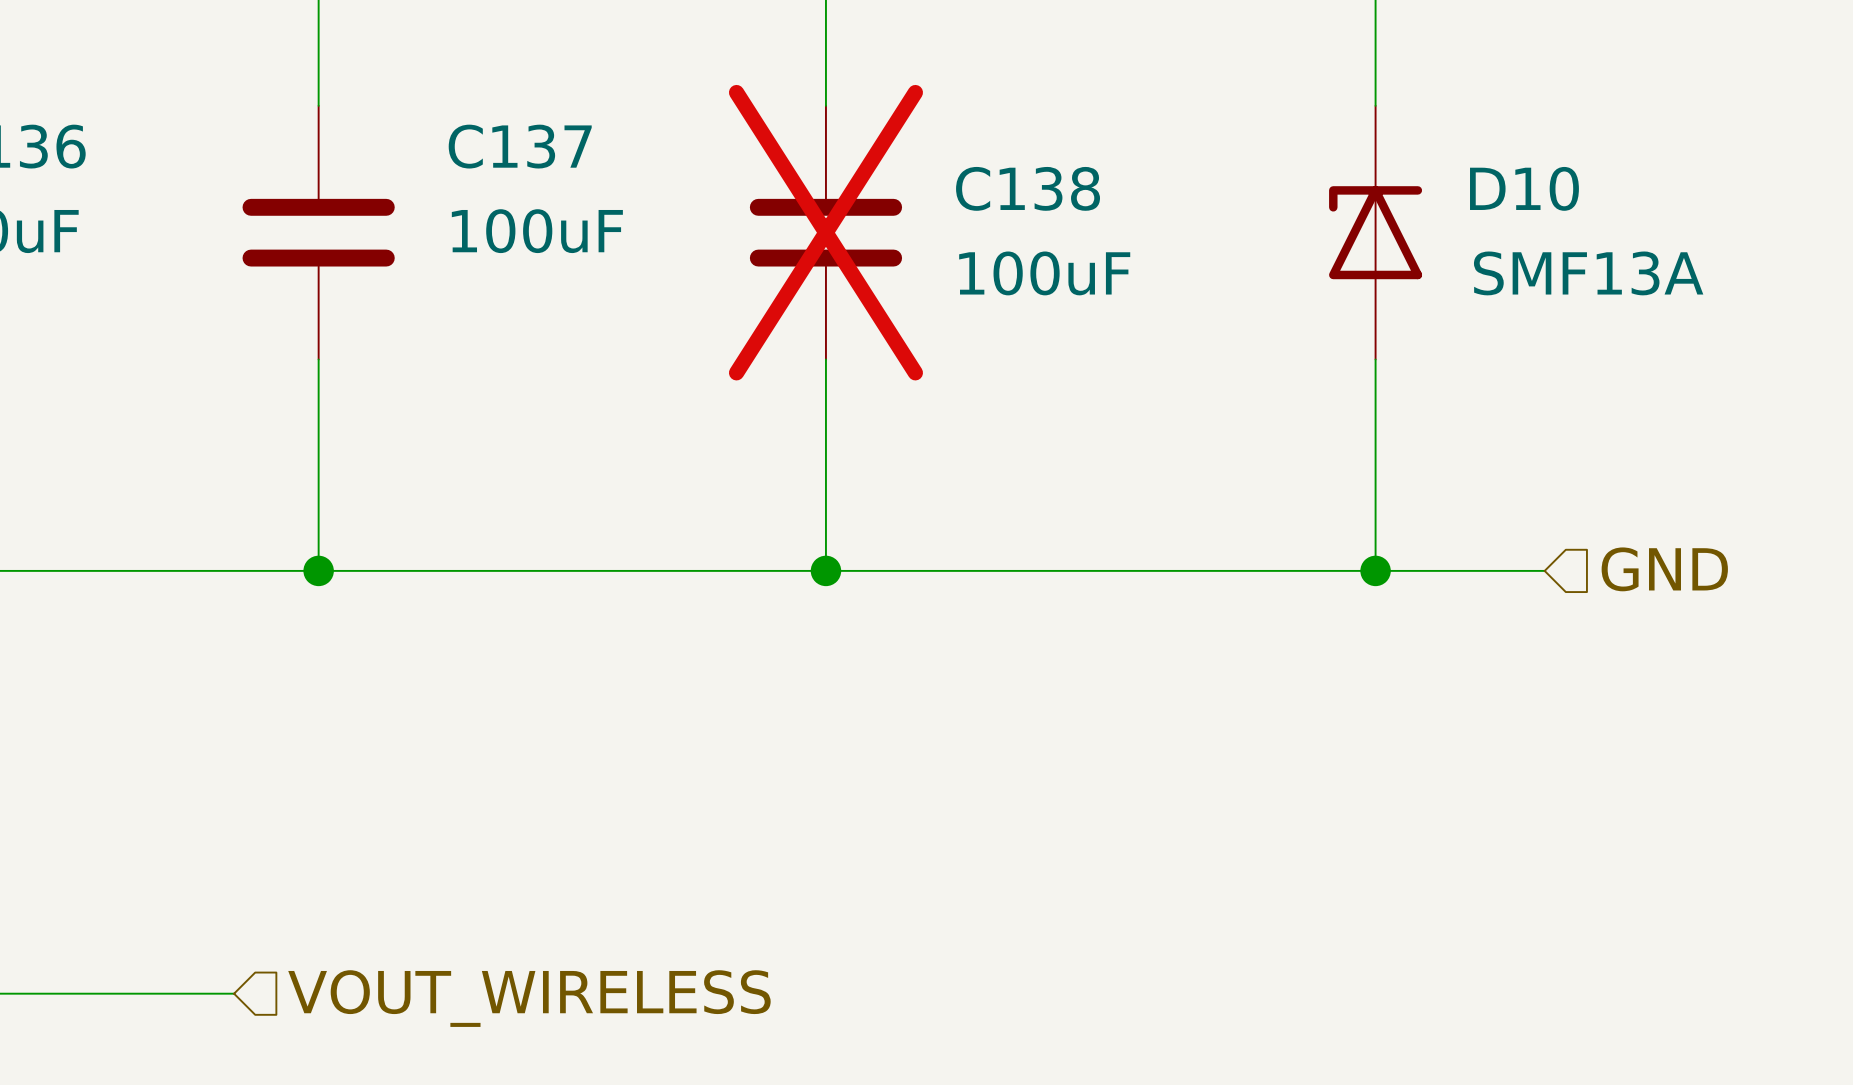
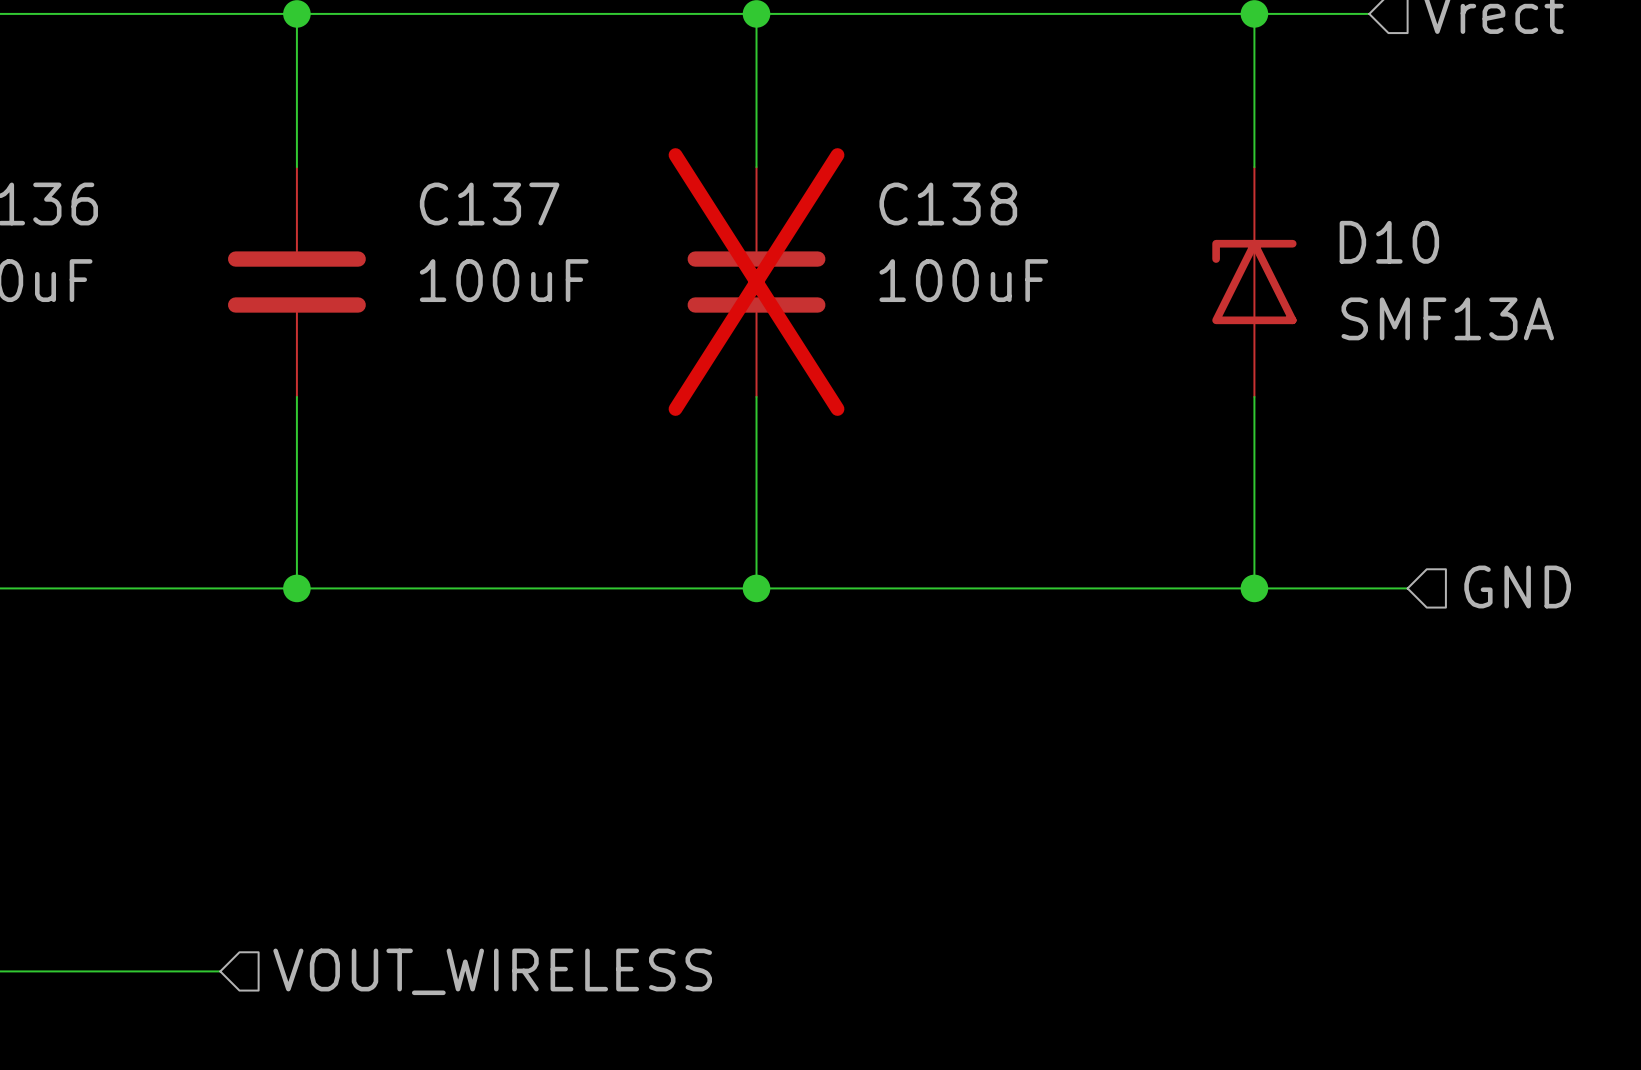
C138 name position: C138 (1028, 188) -> C138 (948, 203)
C138 value position: 100uF (1044, 273) -> 100uF (963, 280)

